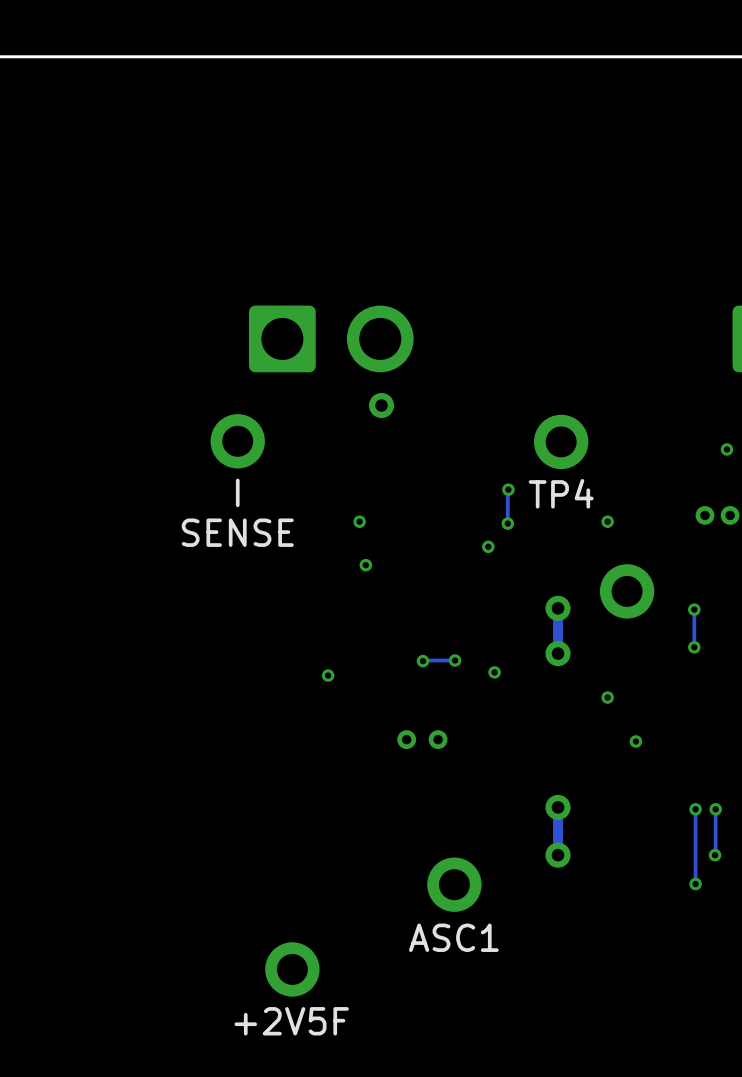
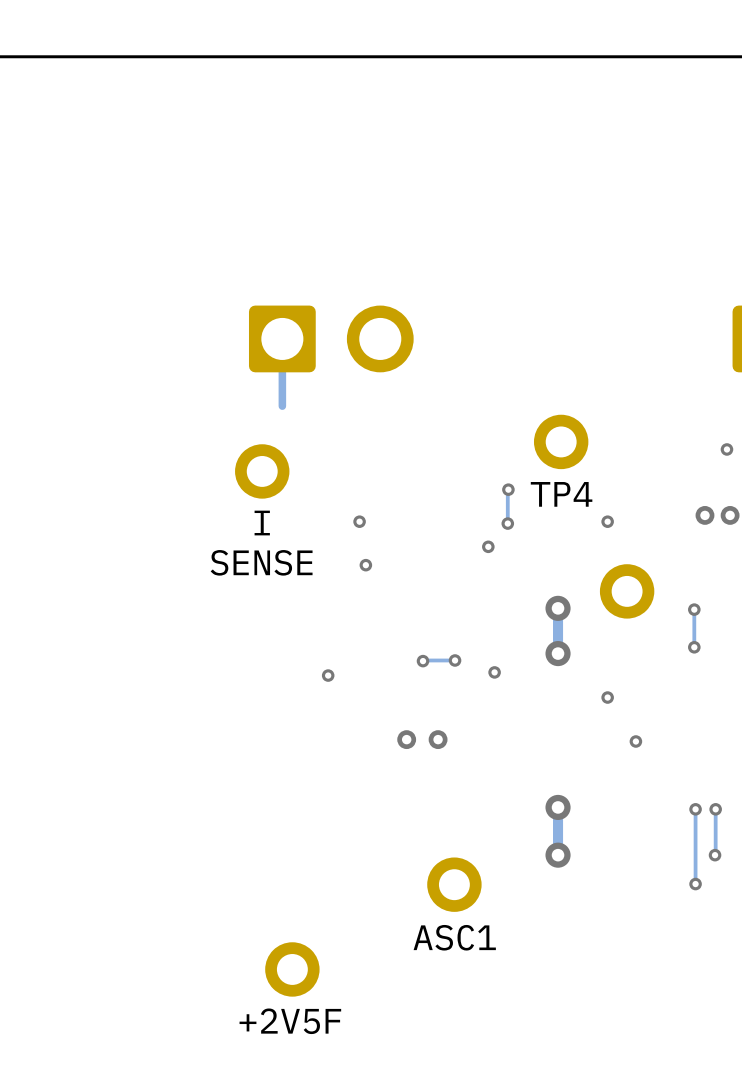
track: none -> (282, 338) (282, 406)
via: (381, 405) -> none
part position: (237, 441) -> (262, 471)
text position: I (237, 492) -> I (262, 523)
text position: SENSE (237, 532) -> SENSE (261, 562)

